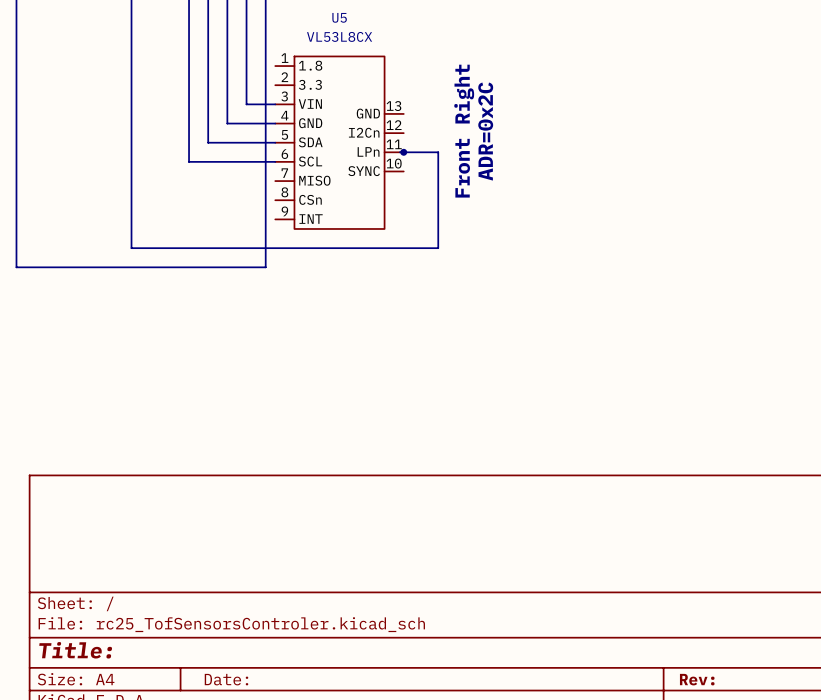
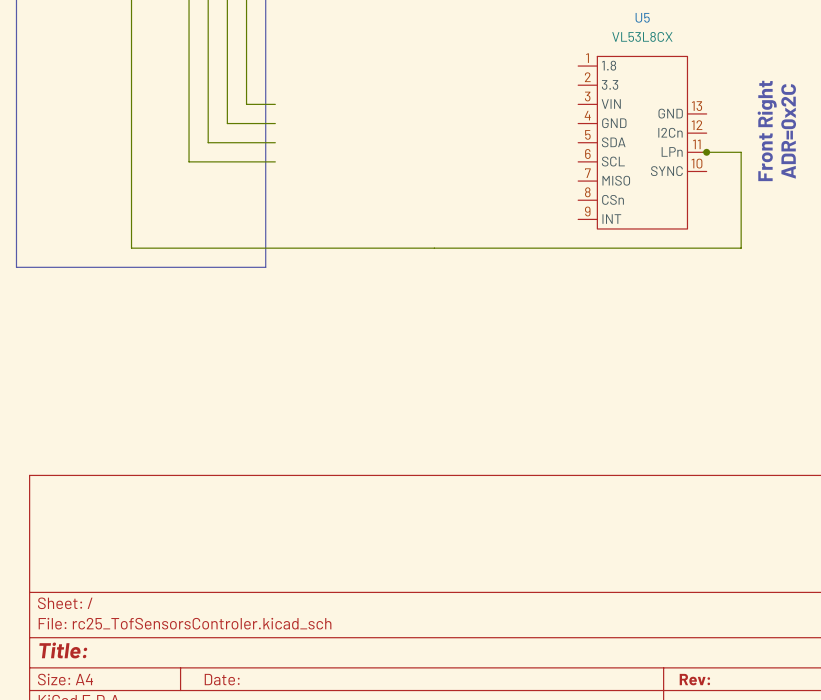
text: Front Right (464, 131) -> none
text: ADR=0x2C (485, 131) -> none
text: none -> Front Right (767, 130)
text: none -> ADR=0x2C (788, 131)
U5 position: (339, 142) -> (642, 142)
wire: (399, 152) (438, 152) (438, 248) -> (702, 152) (741, 152) (741, 248) (438, 248)
junction: (403, 152) -> none
junction: none -> (706, 152)

